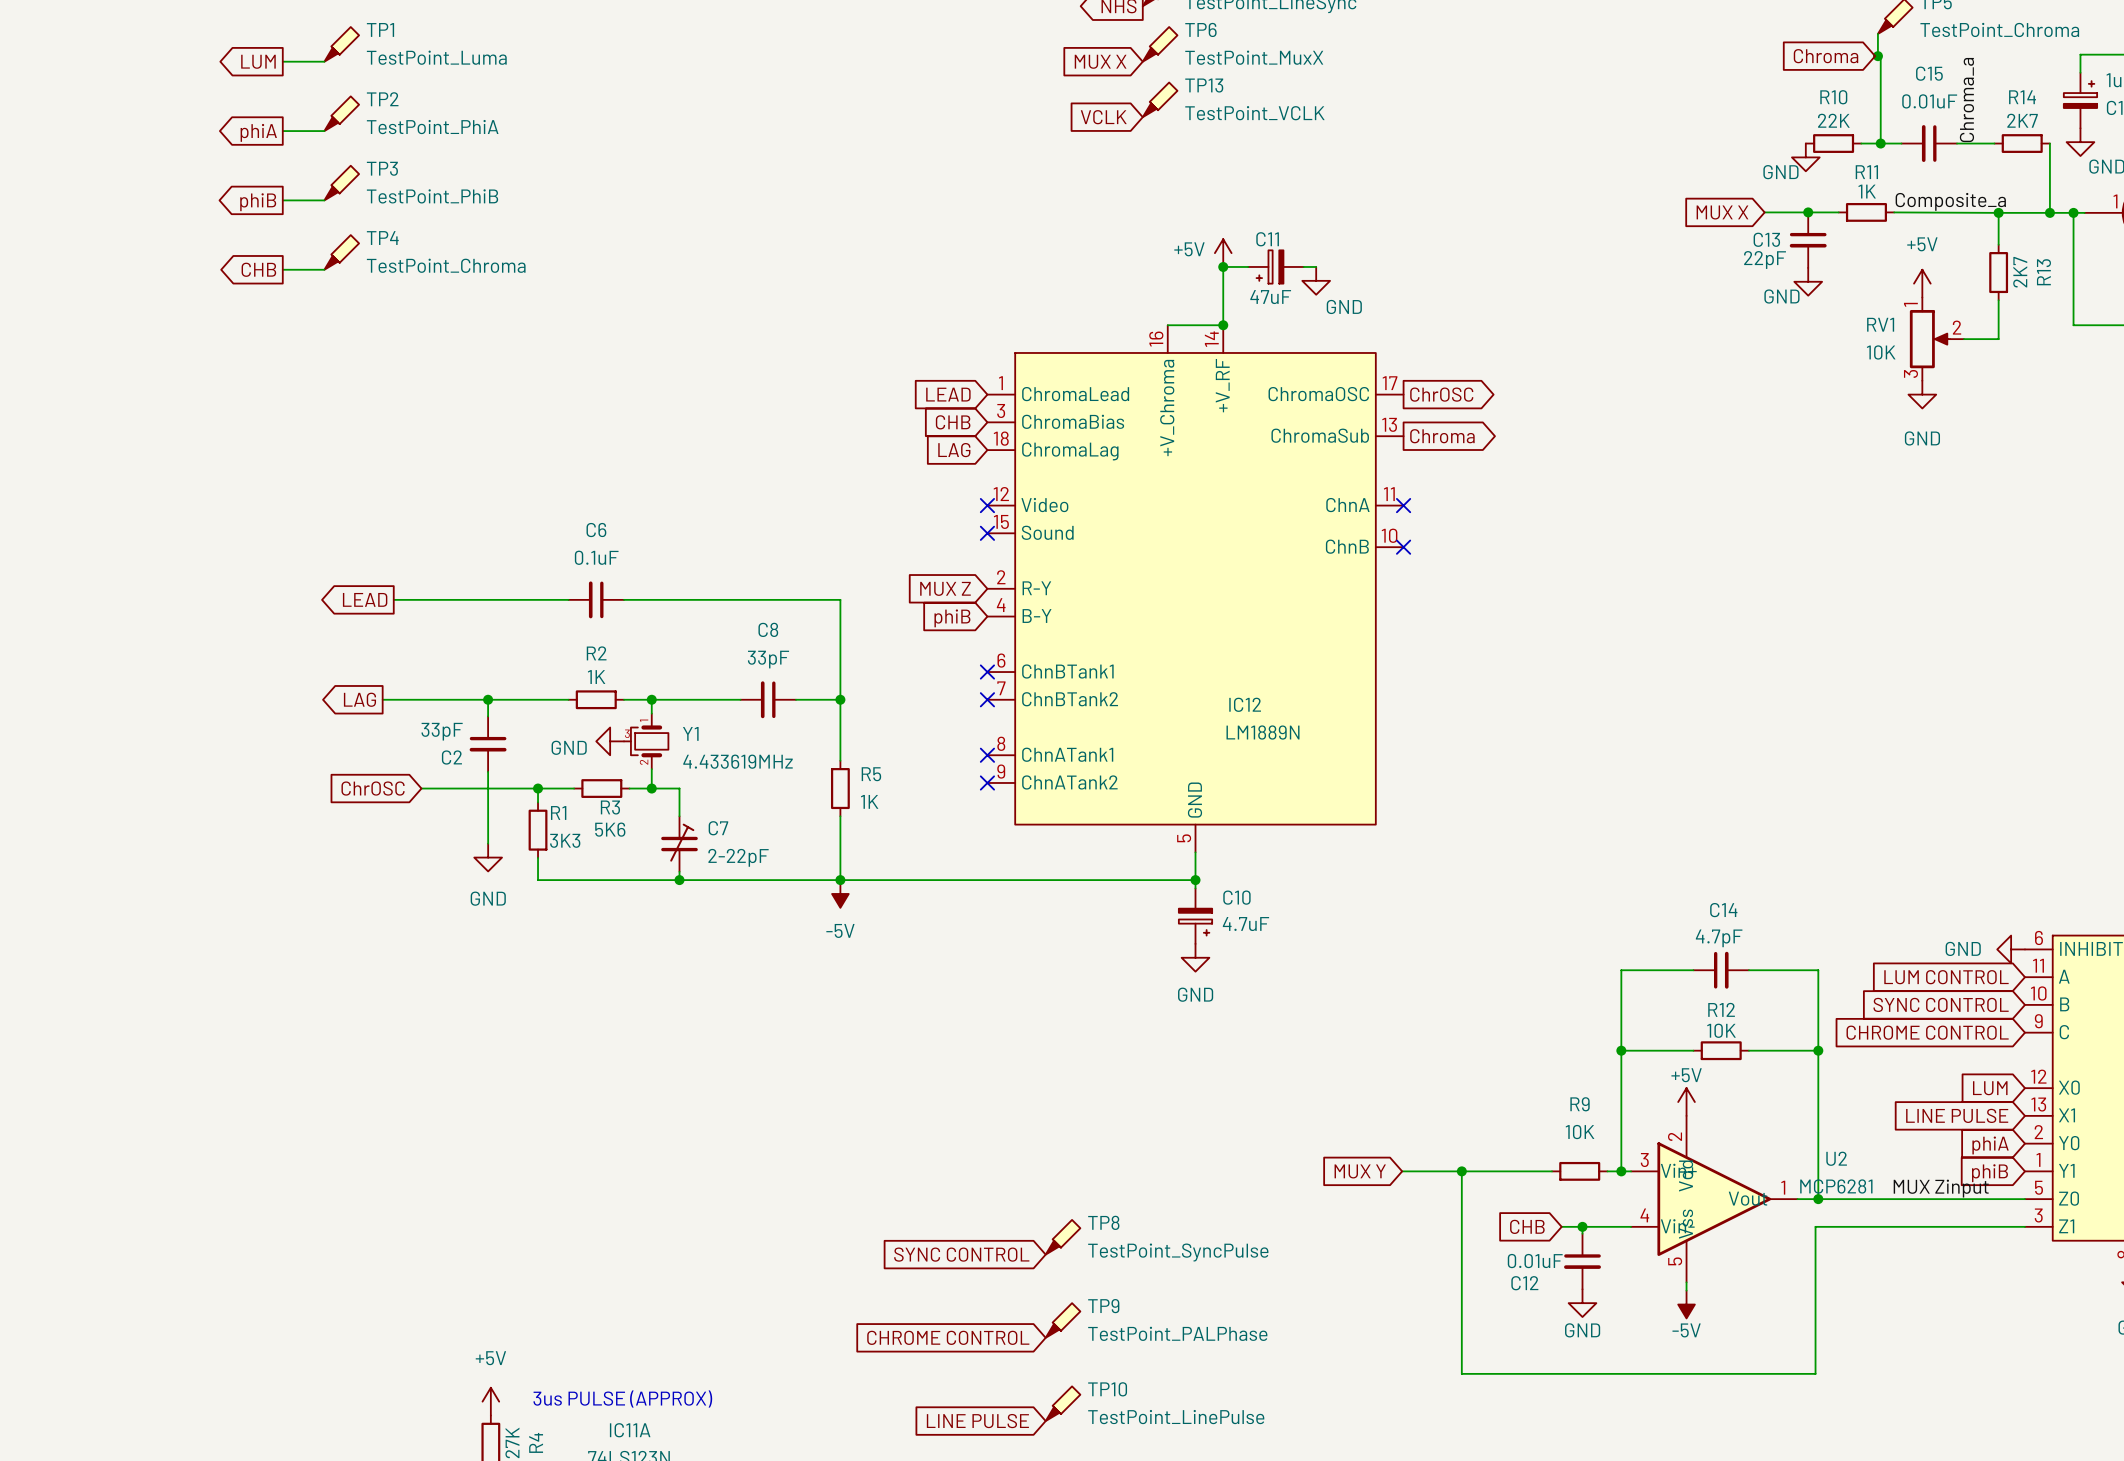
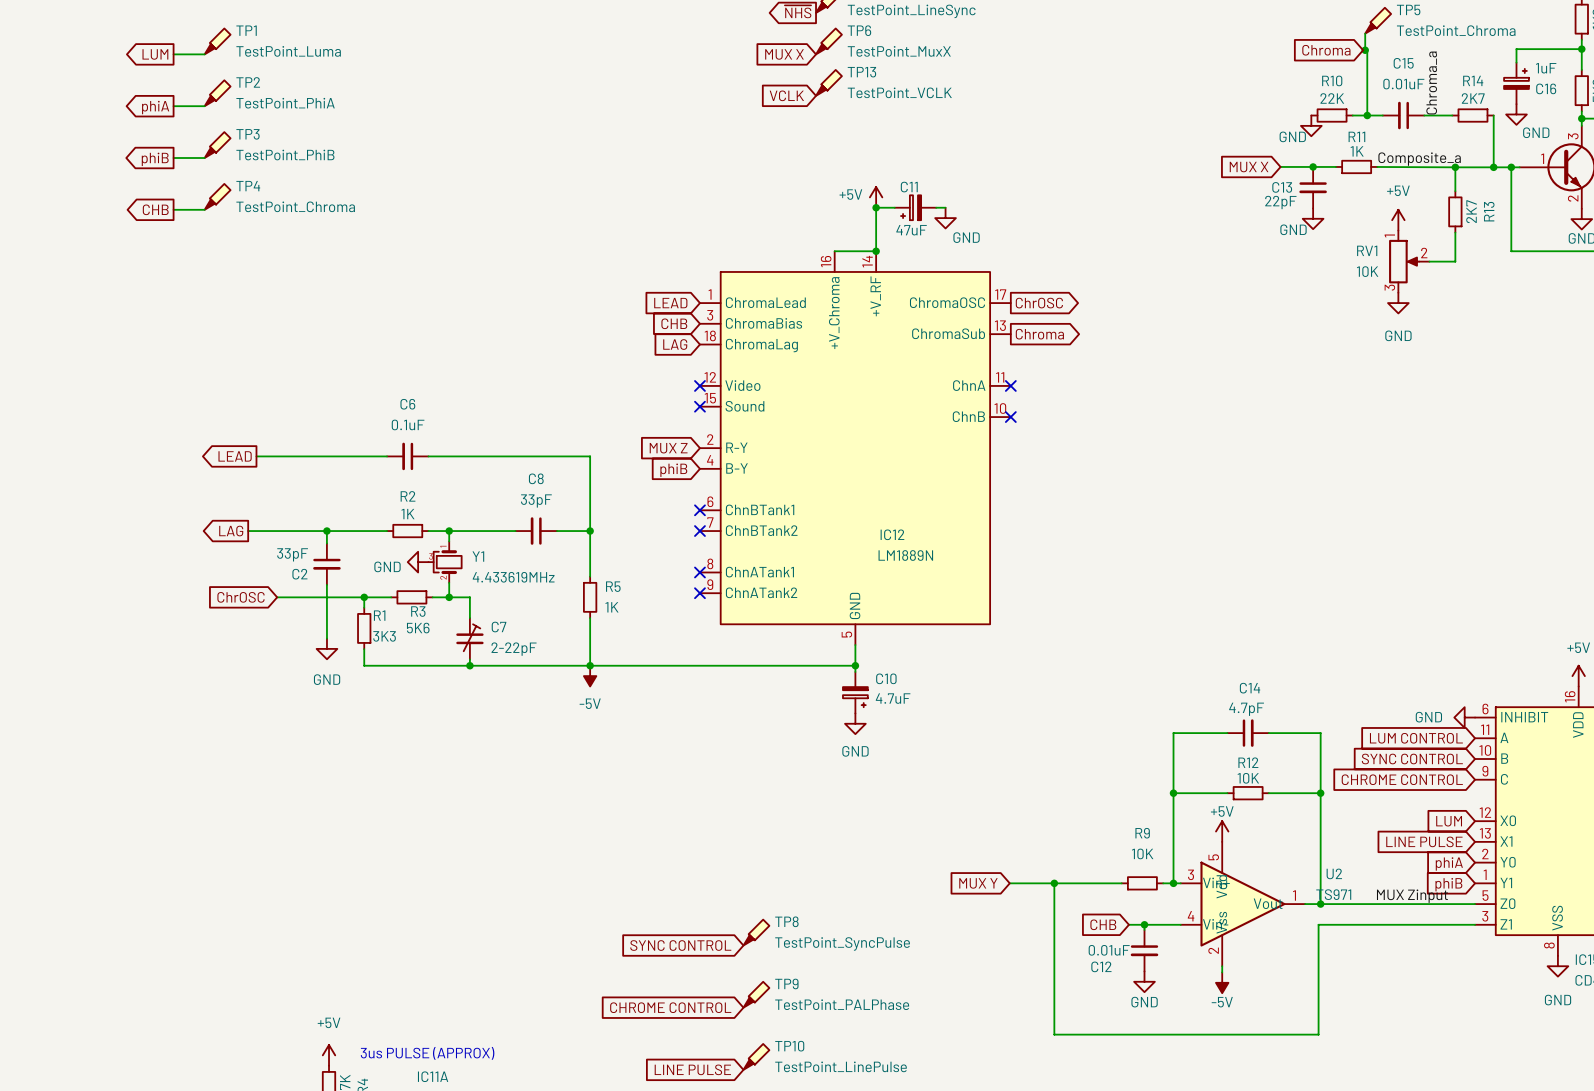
U2 pin number: 2 (1675, 1136) -> 5 (1213, 857)
U2 value: MCP6281 (1836, 1186) -> TS971 (1333, 894)
U2 pin number: 5 (1675, 1261) -> 2 (1213, 950)

